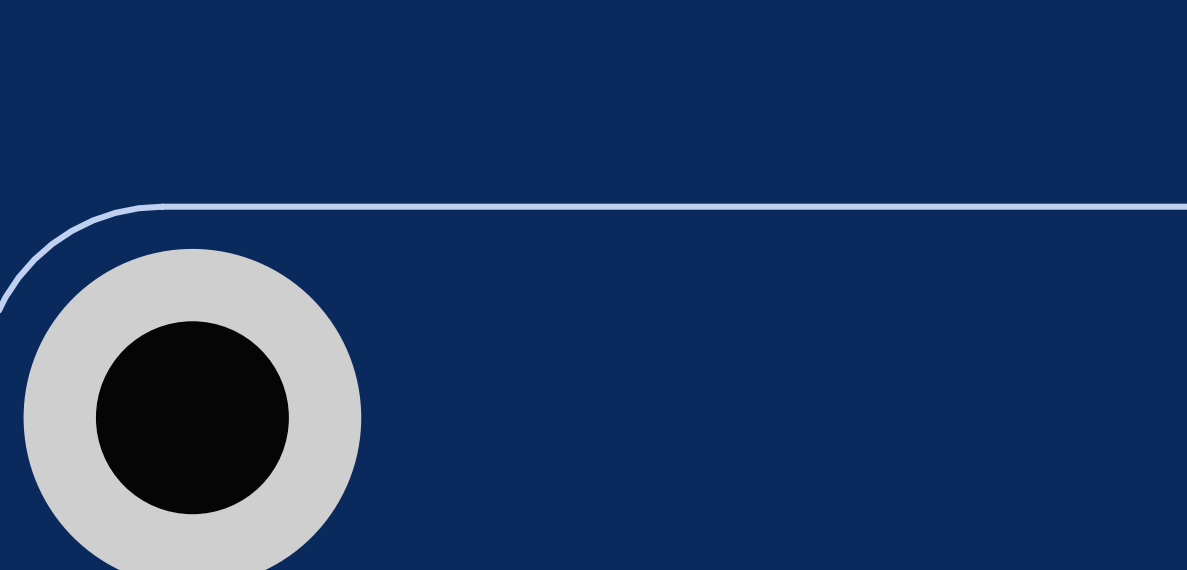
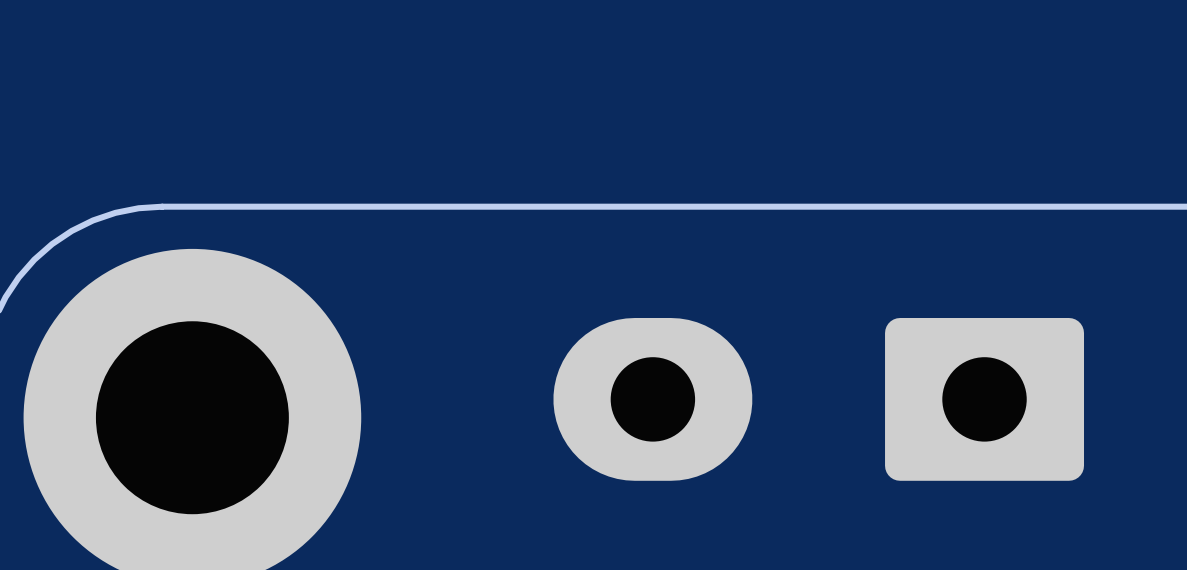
part: none -> (818, 399)

